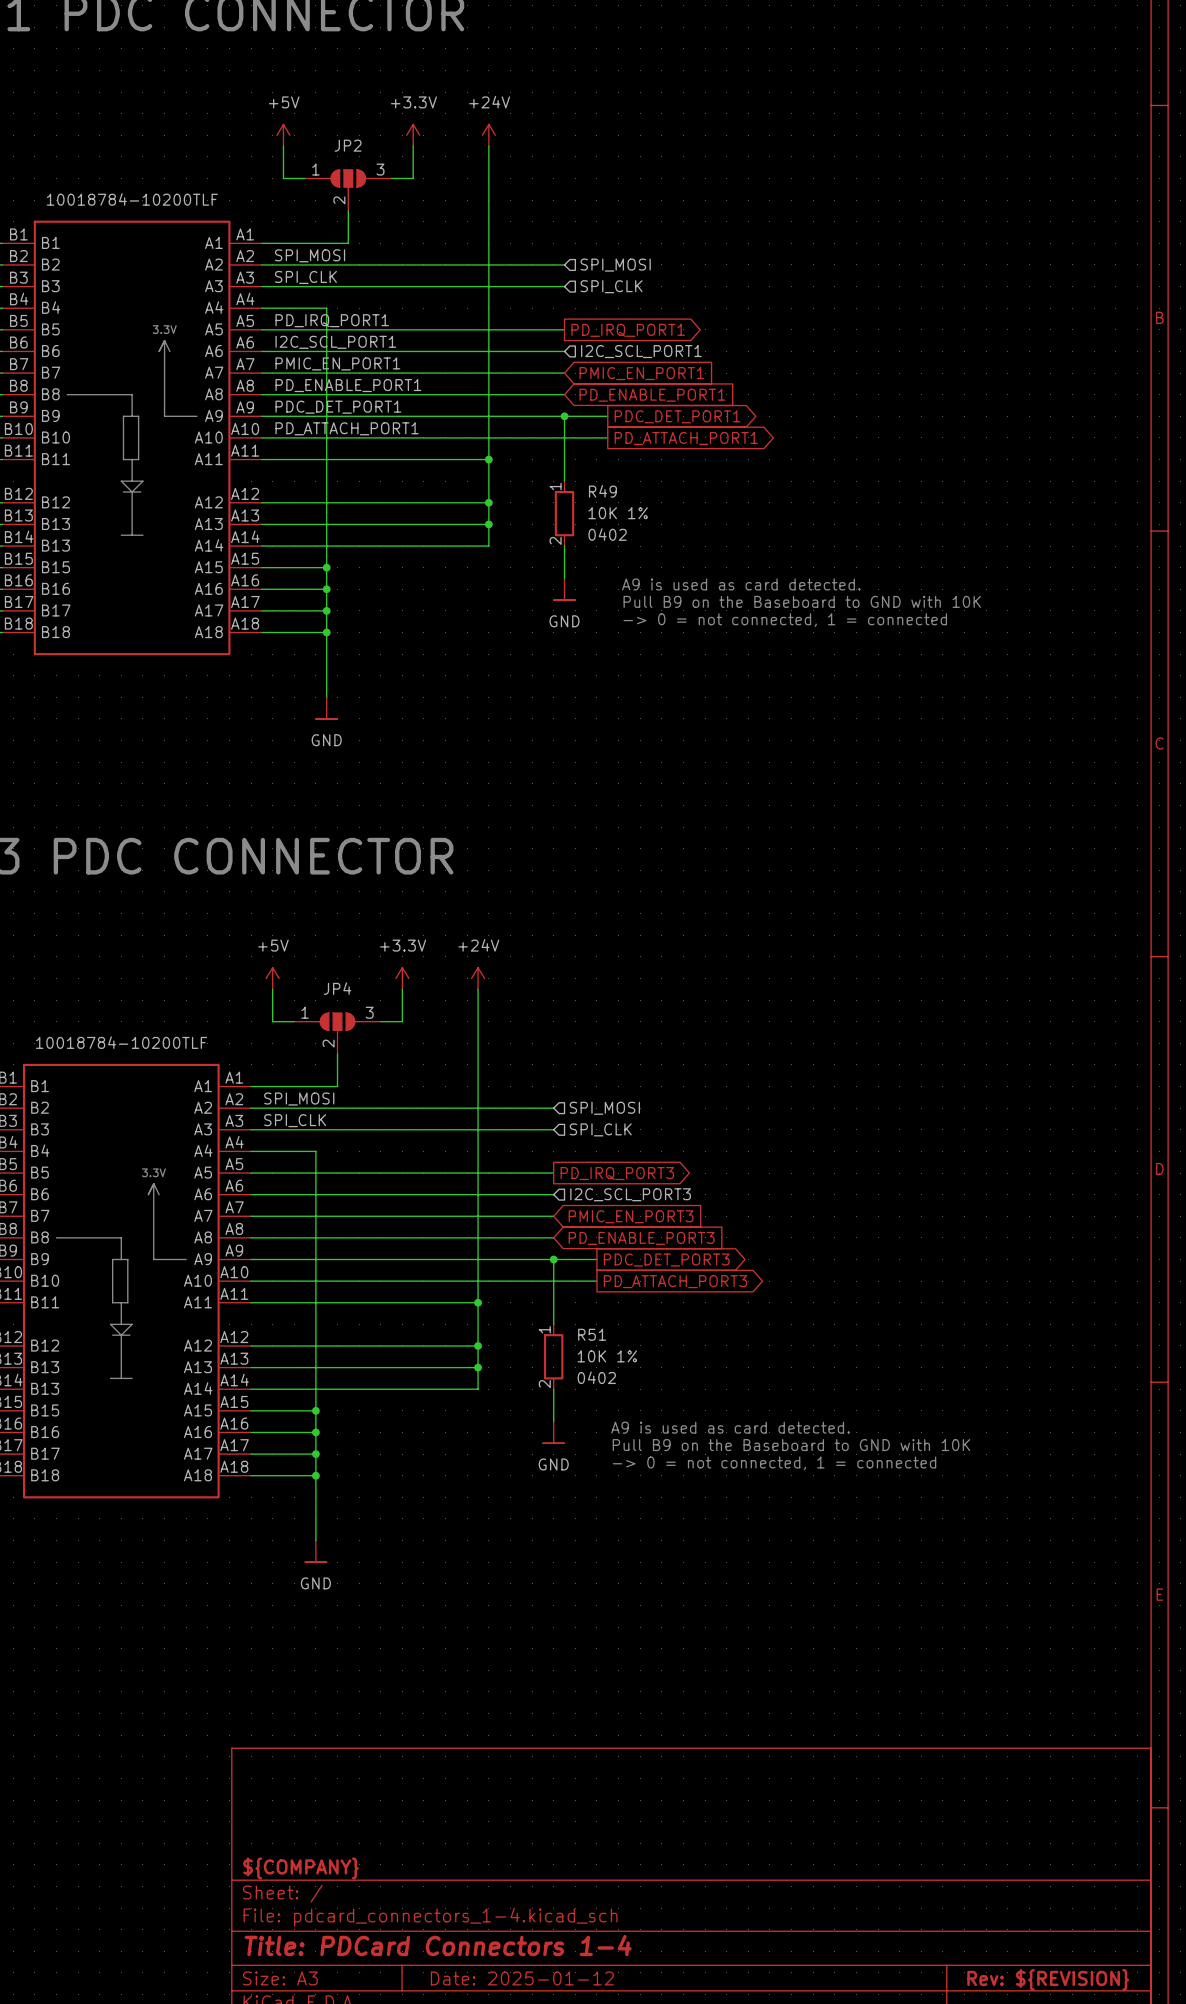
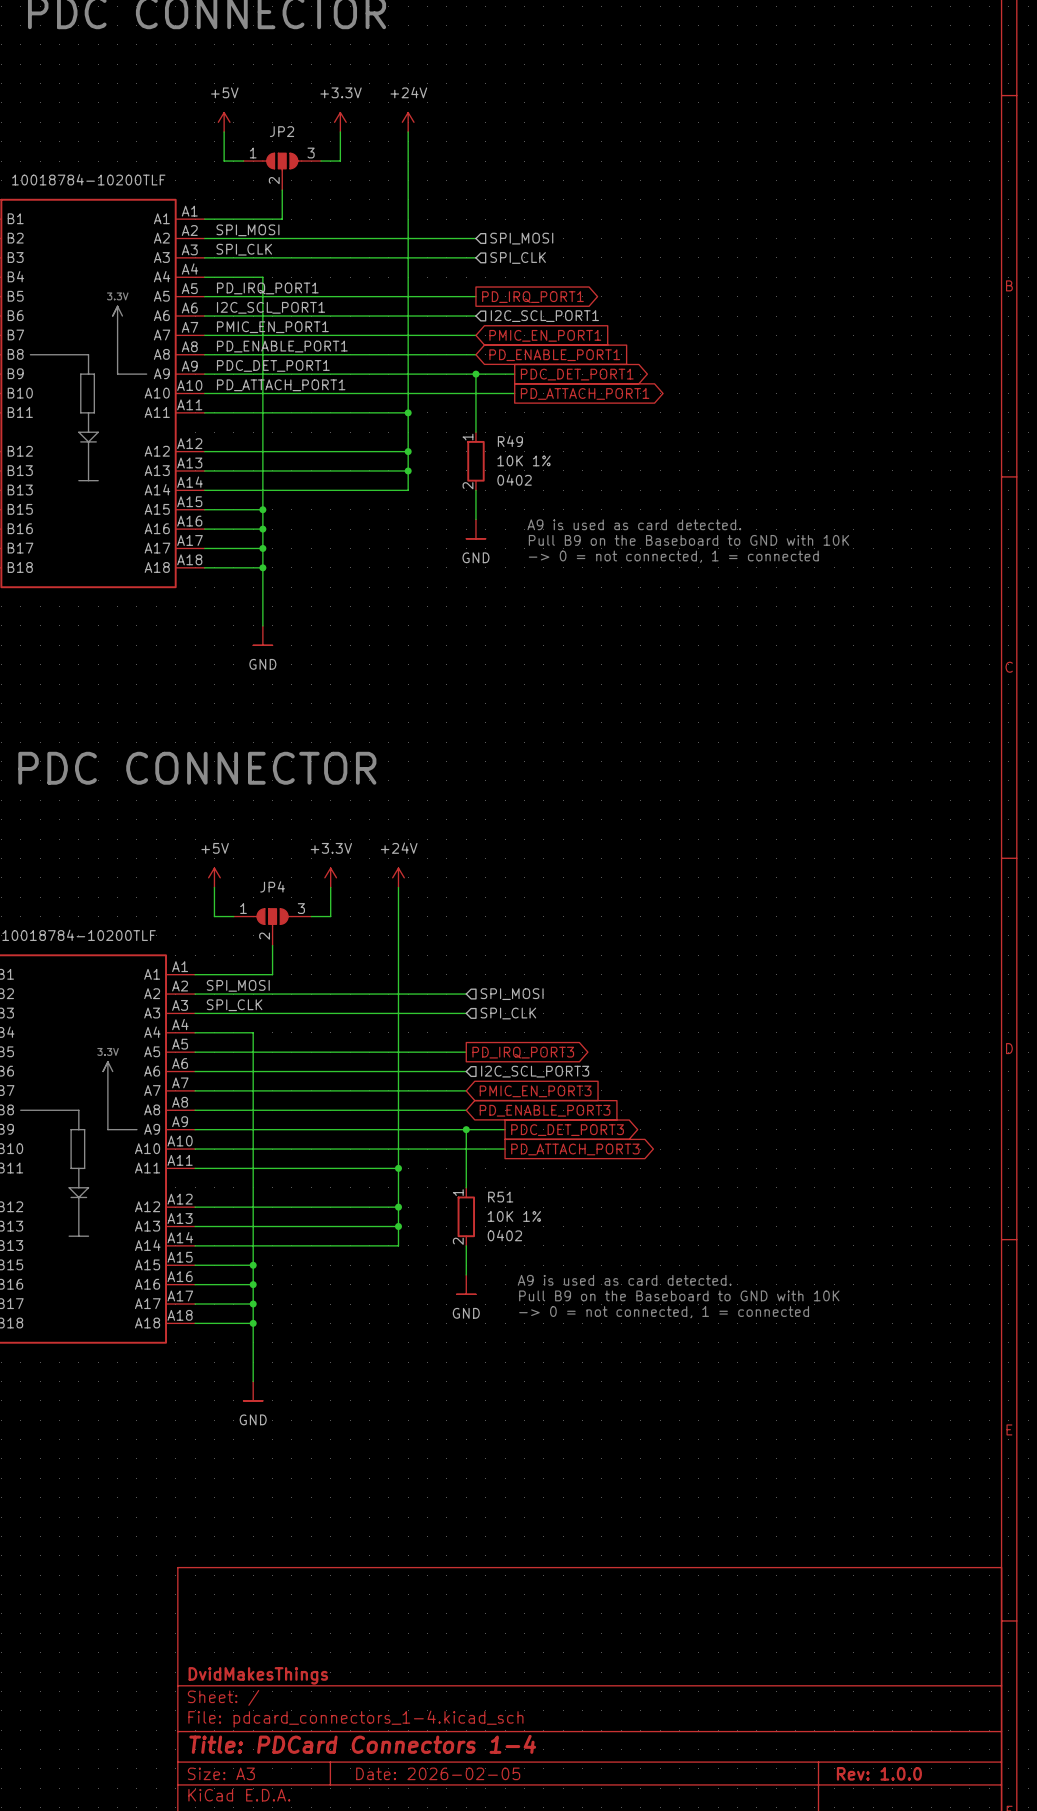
title block: ${COMPANY} (300, 1868) -> DvidMakesThings (258, 1675)
title block: Date: 2025-01-12 (522, 1978) -> Date: 2026-02-05 (438, 1773)
title block: Rev: ${REVISION} (1048, 1979) -> Rev: 1.0.0 (879, 1773)

